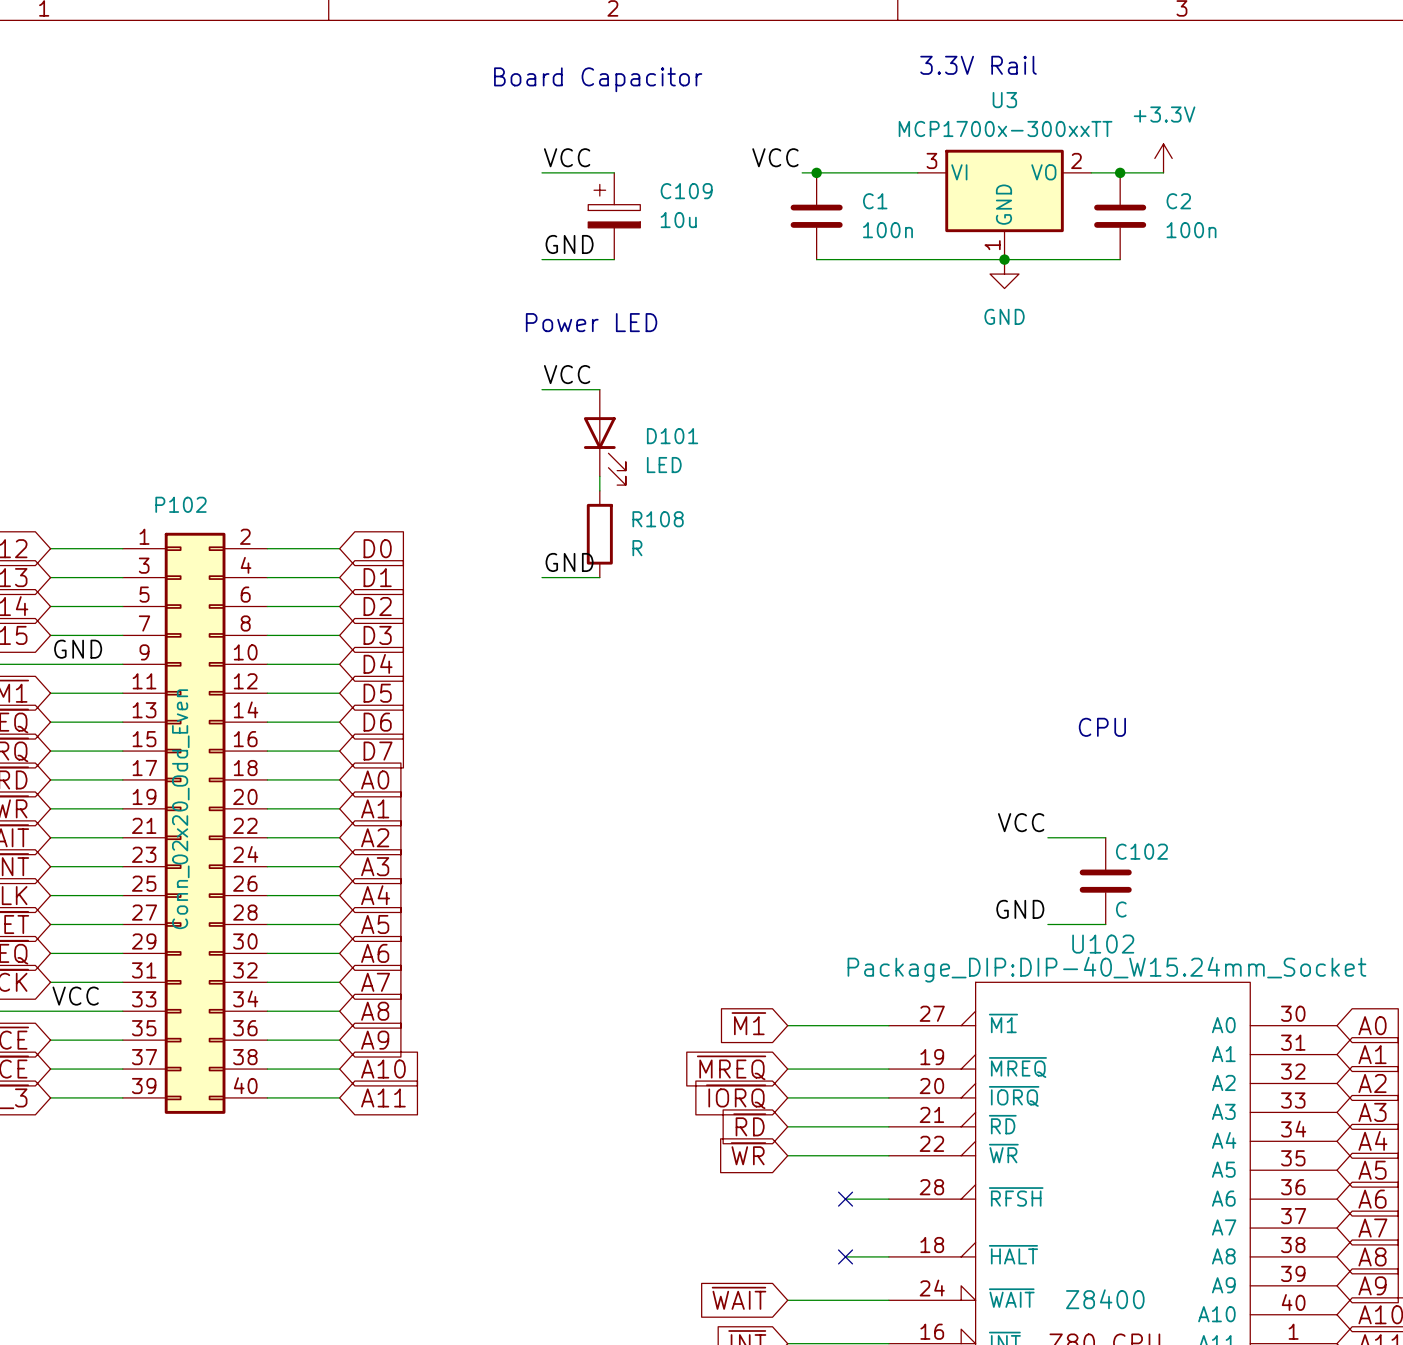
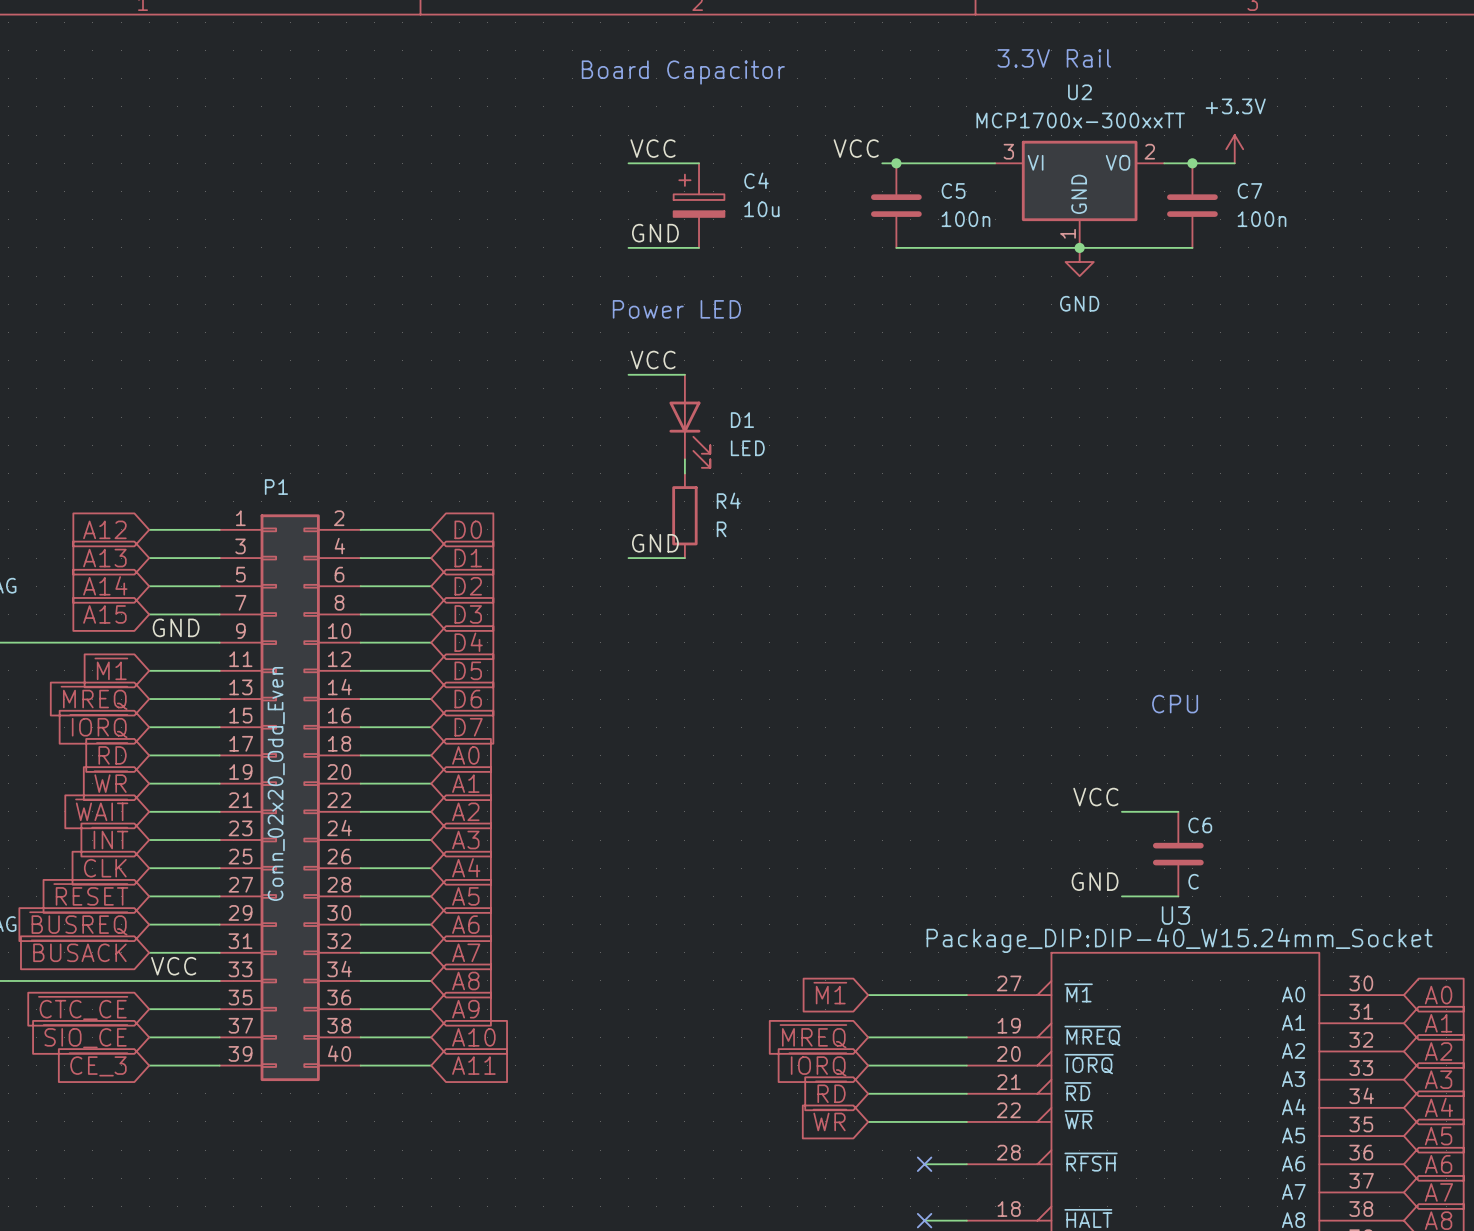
U3 name: U3 (1004, 100) -> U2 (1079, 92)
C109 name: C109 (686, 191) -> C4 (756, 180)
C1 name: C1 (875, 201) -> C5 (953, 190)
C2 name: C2 (1178, 201) -> C7 (1249, 190)
D101 name: D101 (672, 436) -> D1 (742, 420)
P102 name: P102 (180, 504) -> P1 (276, 487)
R108 name: R108 (658, 519) -> R4 (728, 500)
C102 name: C102 (1141, 851) -> C6 (1200, 825)
U102 name: U102 (1103, 944) -> U3 (1175, 915)

